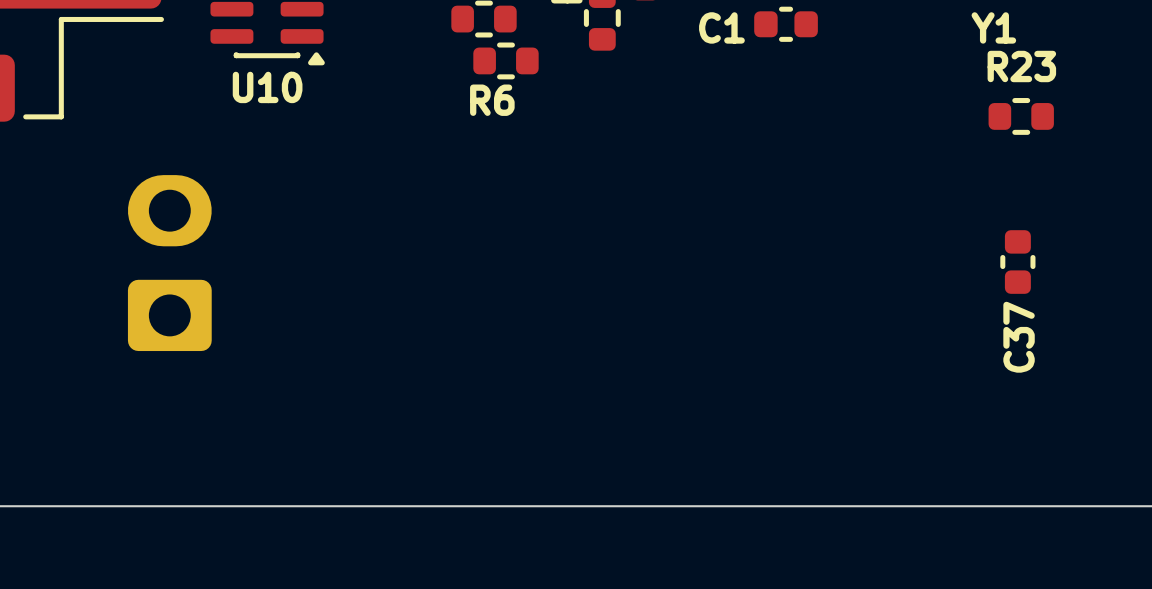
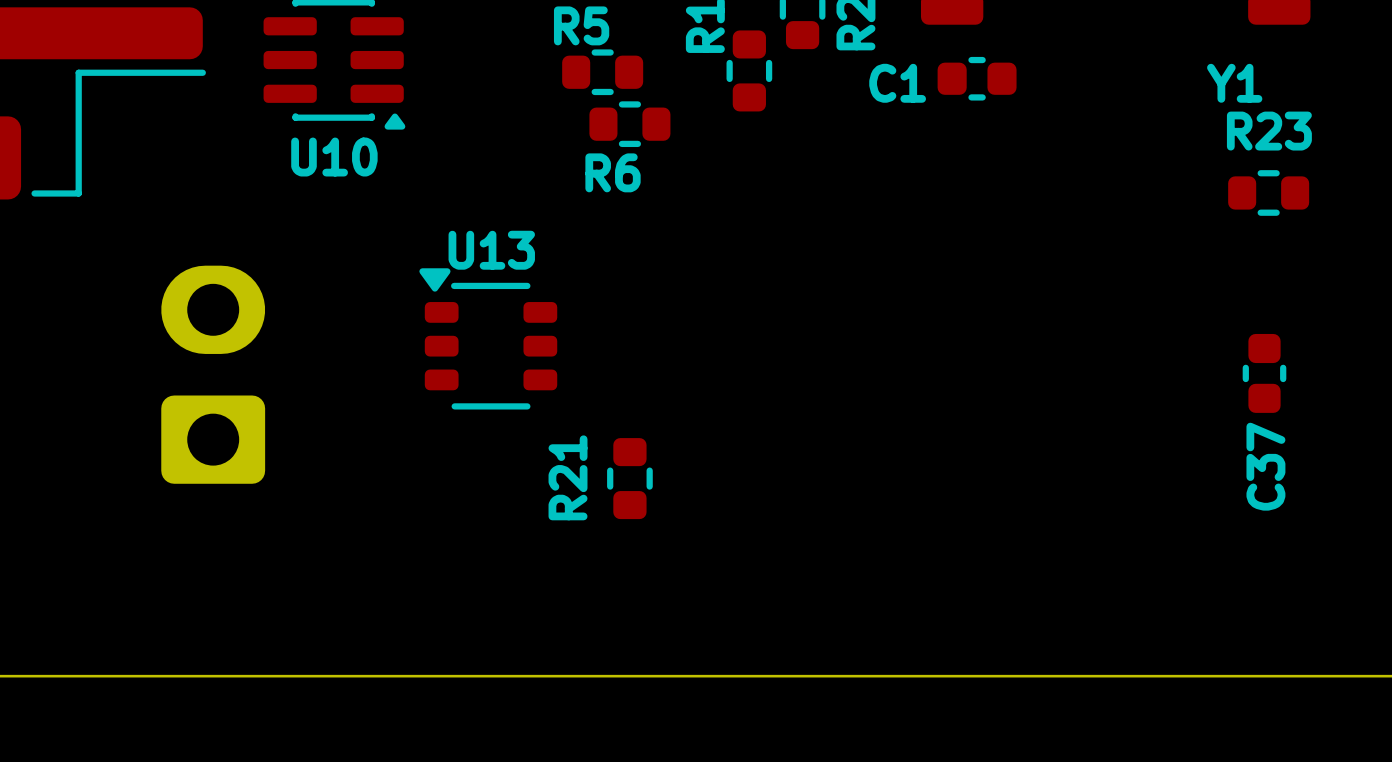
U13: none -> (488, 338)
R21: none -> (629, 478)

